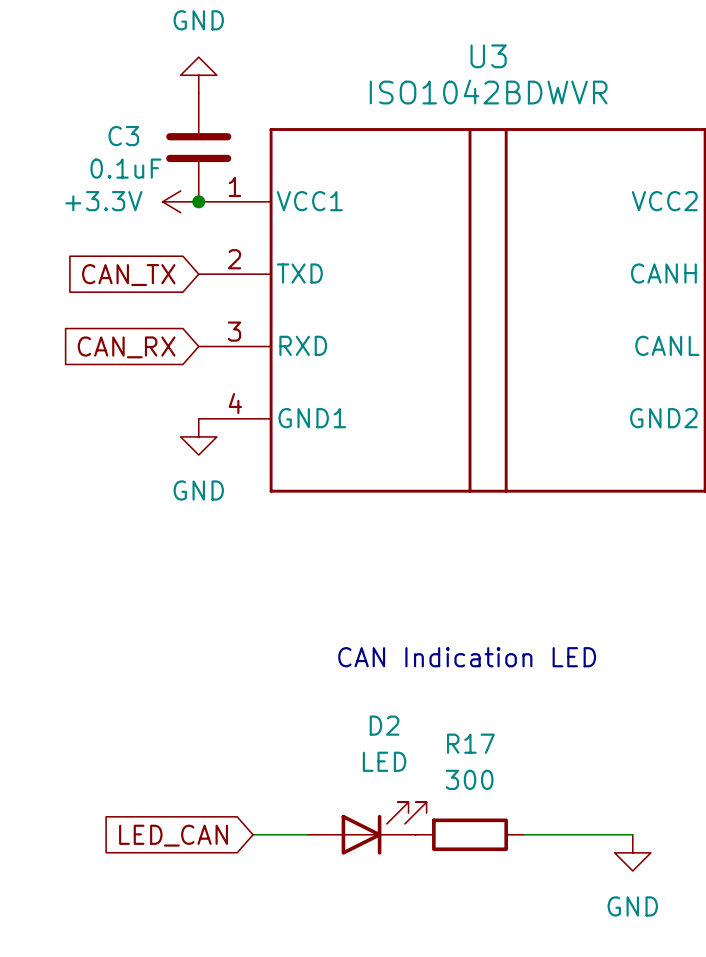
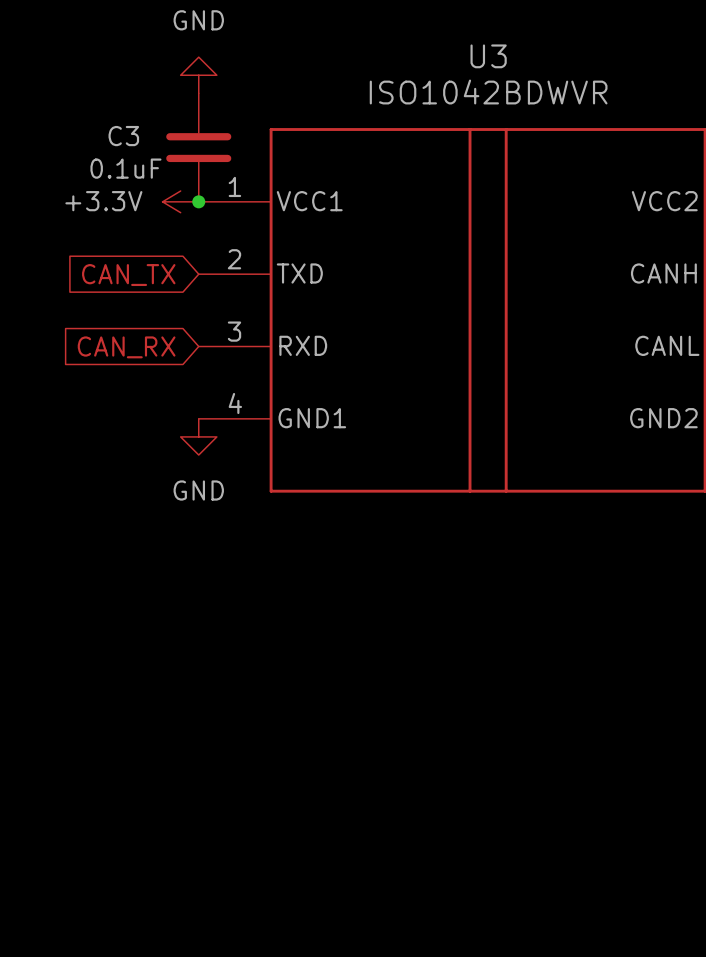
text: CAN Indication LED (467, 657) -> none
D2: LED (366, 828) -> none
wire: (253, 834) (307, 834) -> none
R17: 300 (470, 834) -> none
wire: (524, 834) (632, 834) -> none
global label: LED_CAN (173, 835) -> none
power symbol: GND (632, 852) -> none

